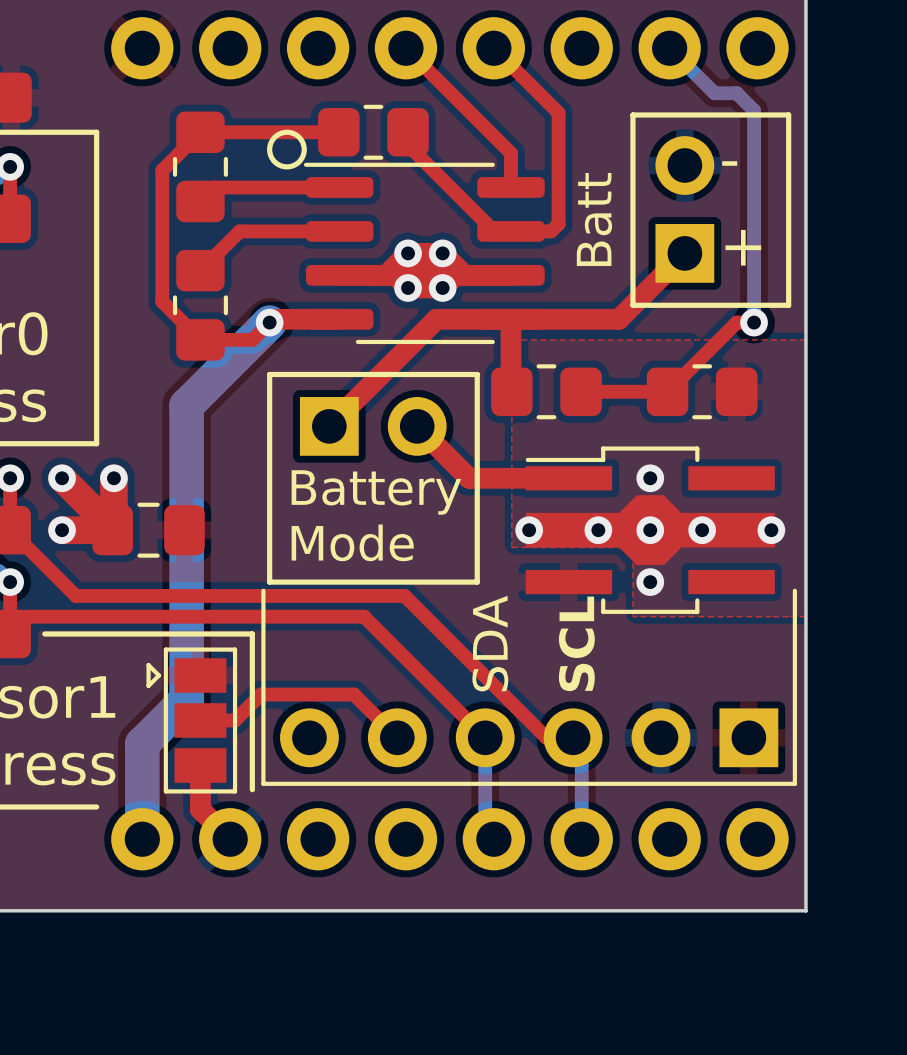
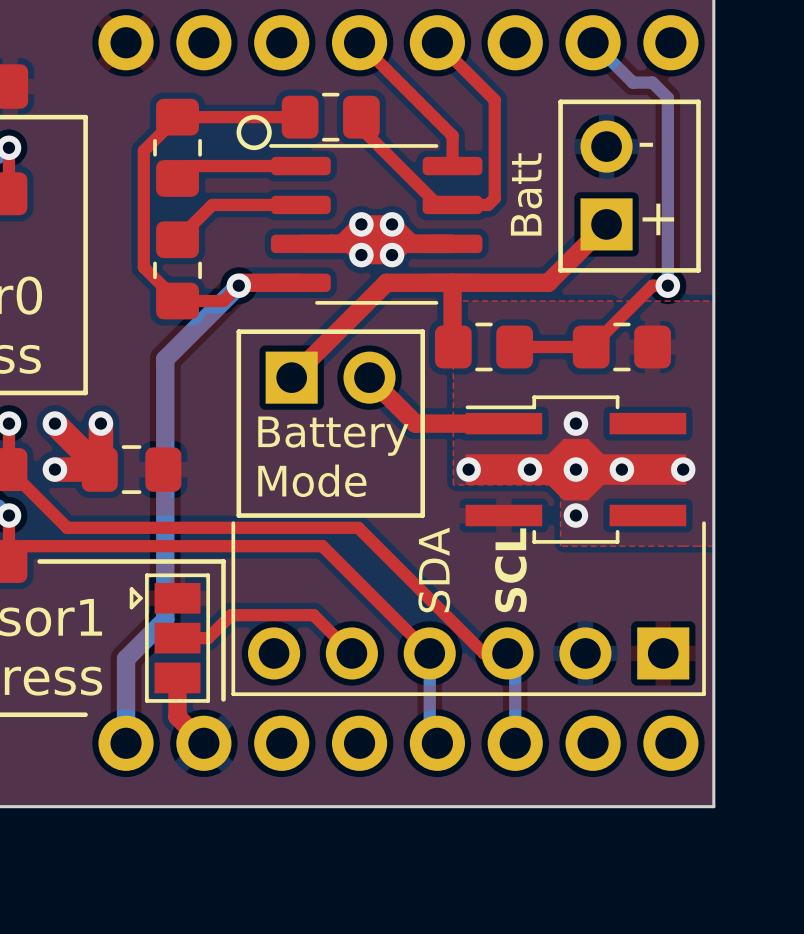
bottom track width: thick (269, 322) (186, 405) (186, 699) (142, 744) (142, 839) -> thin (238, 285) (165, 359) (165, 619) (126, 658) (126, 743)

